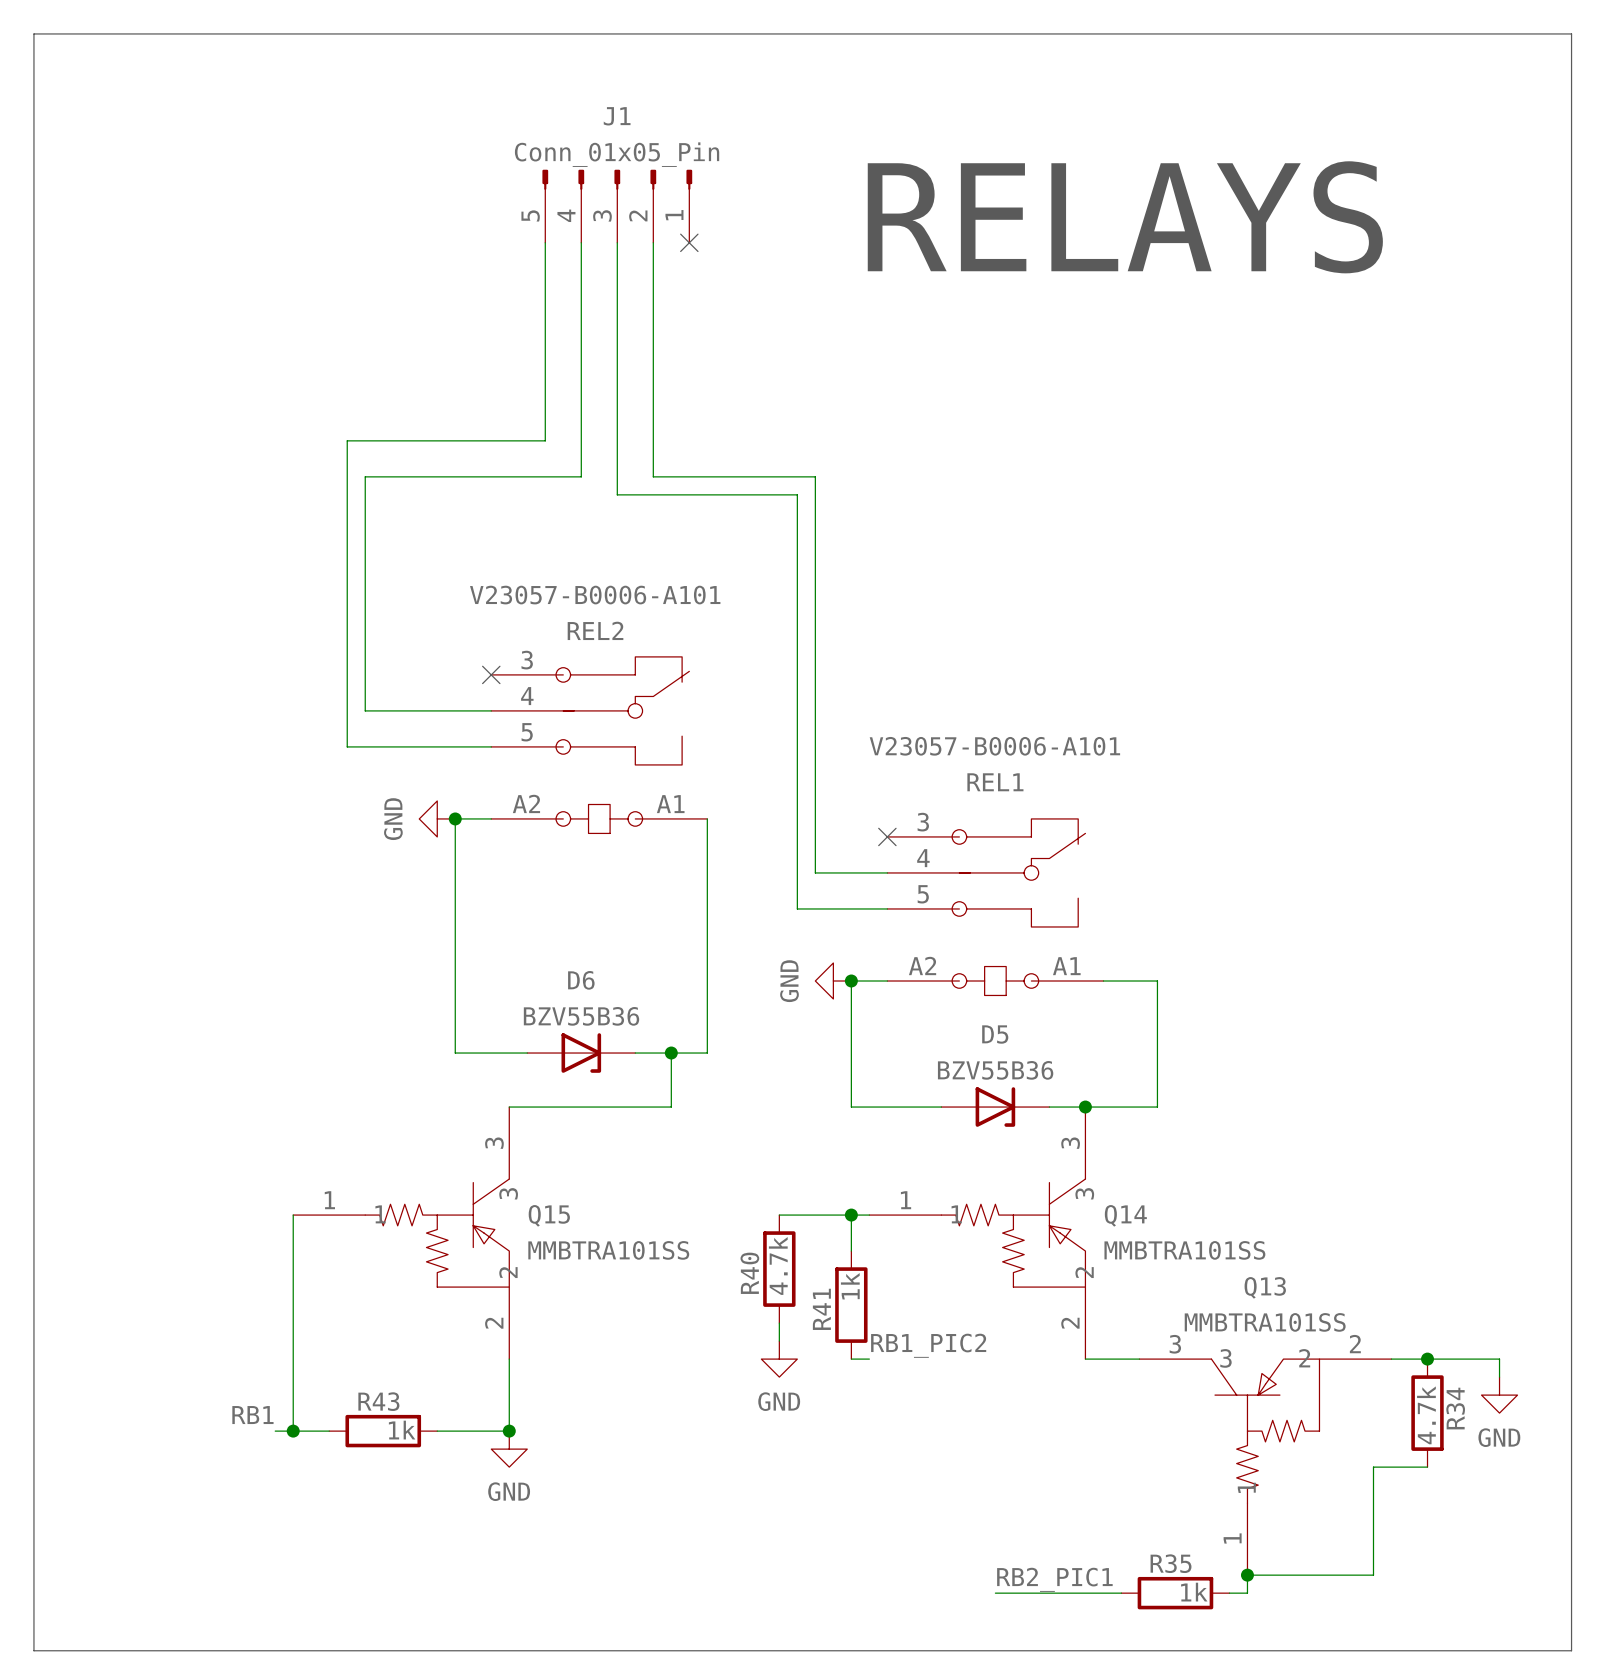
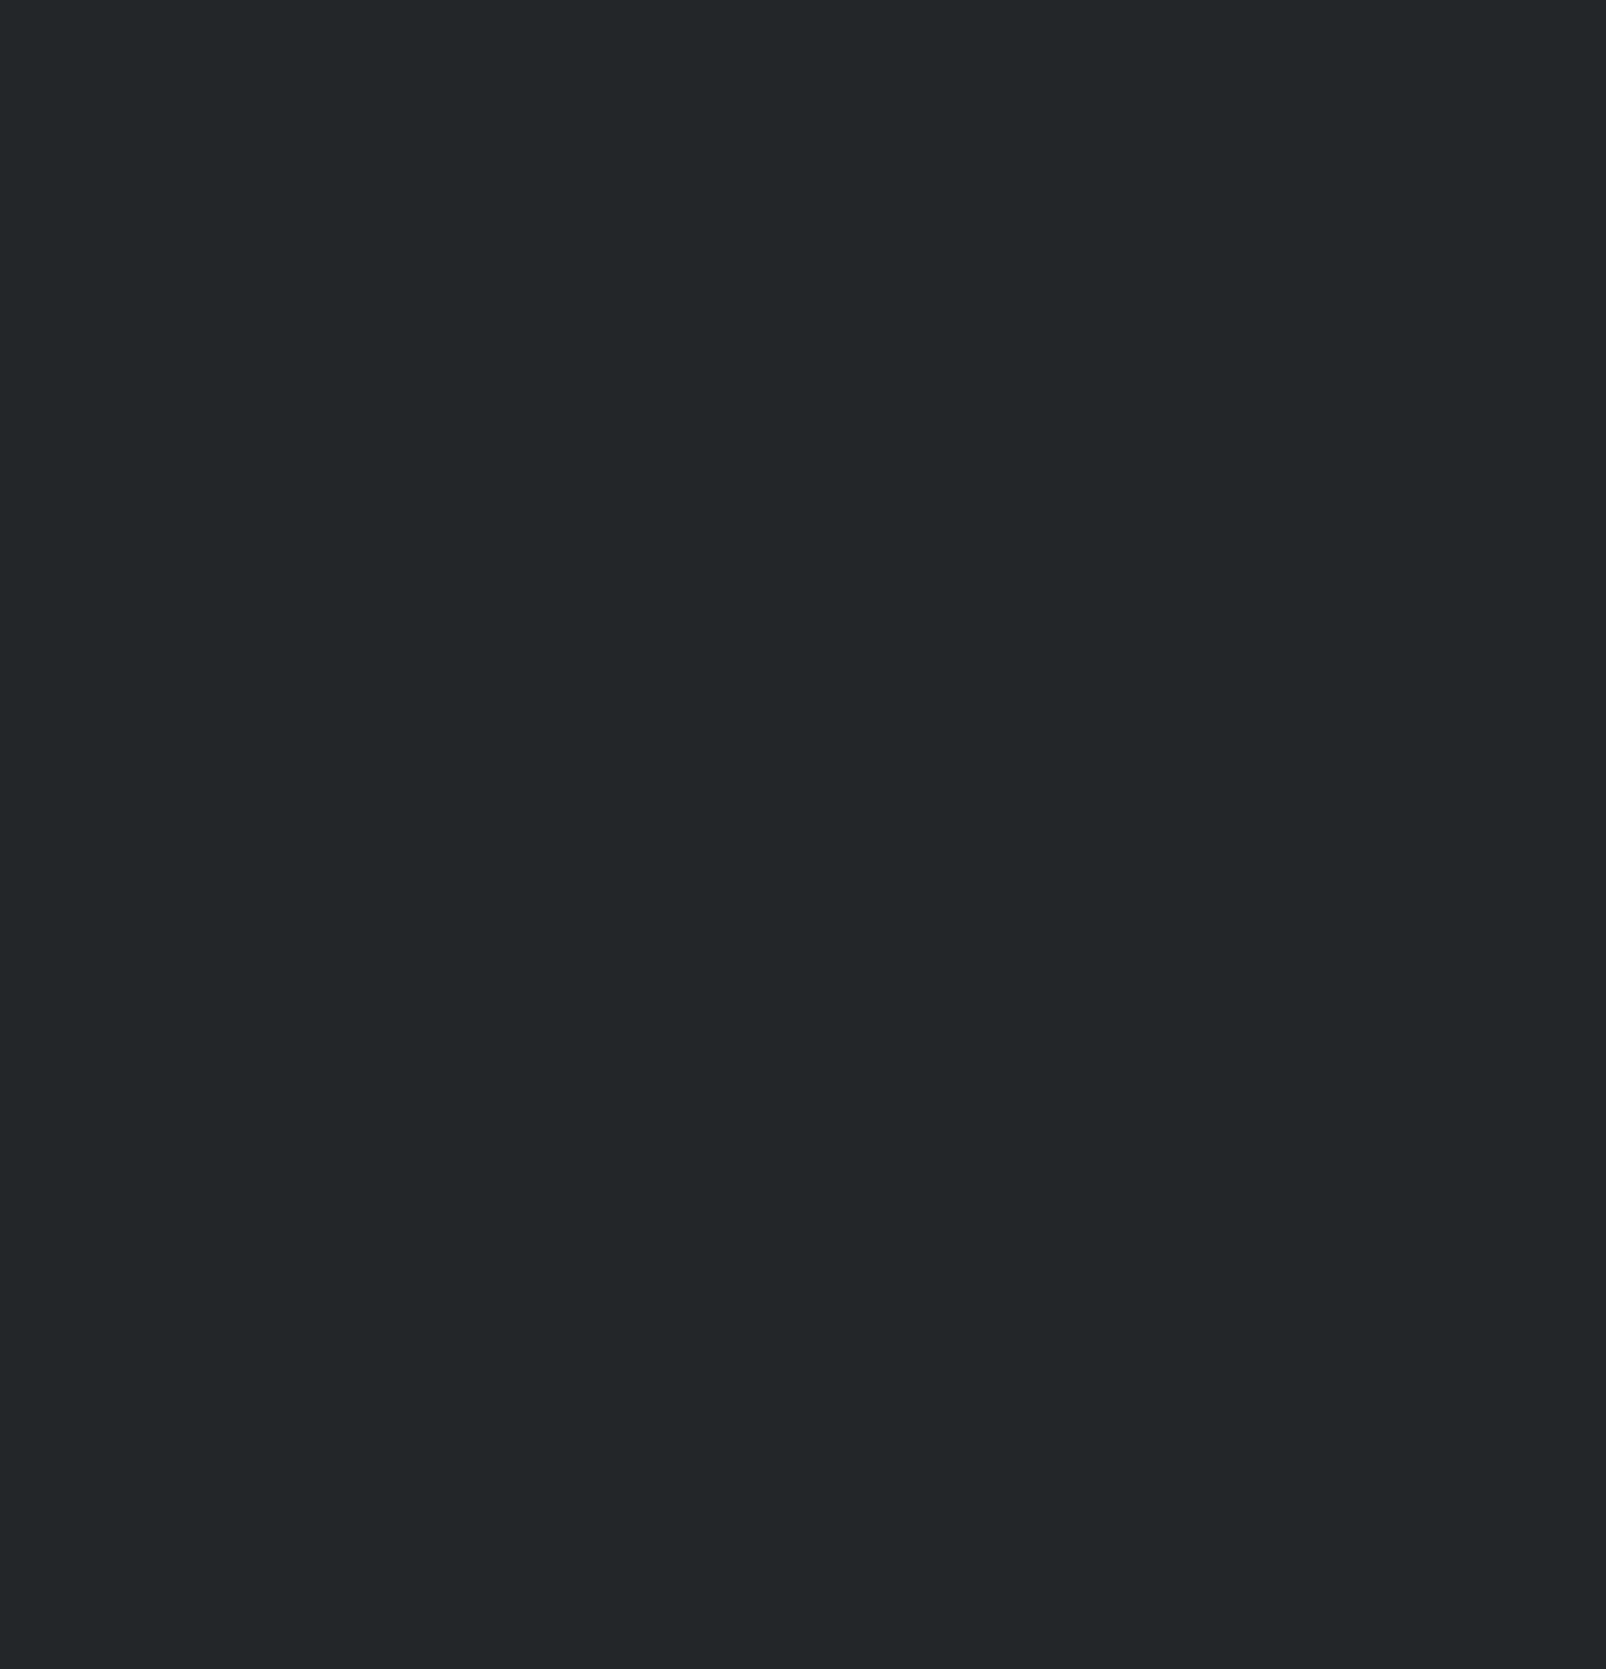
line: (33, 33) (1571, 33) (1571, 1650) (33, 1650) (33, 33) -> none
J1: Conn_01x05_Pin (617, 206) -> none
text: RELAYS (1125, 217) -> none
wire: (545, 242) (545, 440) (347, 440) (347, 746) (491, 746) -> none
wire: (581, 242) (581, 476) (365, 476) (365, 710) (491, 710) -> none
wire: (617, 242) (617, 494) (797, 494) (797, 908) (887, 908) -> none
wire: (653, 242) (653, 476) (815, 476) (815, 872) (887, 872) -> none
no-connect mark: (689, 242) -> none
no-connect mark: (491, 674) -> none
REL2: V23057-B0006-A101 (599, 745) -> none
power symbol: GND (437, 818) -> none
junction: (455, 818) -> none
wire: (491, 818) (455, 818) (455, 1053) (527, 1053) -> none
wire: (707, 818) (707, 1053) (635, 1053) -> none
no-connect mark: (887, 836) -> none
REL1: V23057-B0006-A101 (995, 907) -> none
power symbol: GND (833, 981) -> none
junction: (851, 981) -> none
wire: (887, 981) (851, 981) (851, 1107) (941, 1107) -> none
wire: (1103, 981) (1157, 981) (1157, 1107) (1049, 1107) -> none
D6: BZV55B36 (581, 1053) -> none
wire: (671, 1053) (671, 1107) (509, 1107) -> none
junction: (671, 1053) -> none
D5: BZV55B36 (995, 1107) -> none
junction: (1085, 1107) -> none
wire: (293, 1215) (293, 1431) -> none
wire: (779, 1215) (869, 1215) -> none
wire: (851, 1215) (851, 1251) -> none
junction: (851, 1215) -> none
Q15: MMBTRA101SS (401, 1233) -> none
Q14: MMBTRA101SS (977, 1233) -> none
R40: 4.7k (779, 1269) -> none
R41: 1k (851, 1305) -> none
wire: (779, 1323) (779, 1341) -> none
label: RB1_PIC2 (928, 1345) -> none
wire: (509, 1359) (509, 1431) (437, 1431) -> none
power symbol: GND (779, 1359) -> none
wire: (851, 1359) (869, 1359) -> none
wire: (1085, 1359) (1139, 1359) -> none
wire: (1391, 1359) (1499, 1359) (1499, 1377) -> none
junction: (1427, 1359) -> none
power symbol: GND (1499, 1395) -> none
R34: 4.7k (1427, 1413) -> none
label: RB1 (252, 1415) -> none
wire: (275, 1431) (329, 1431) -> none
junction: (293, 1431) -> none
R43: 1k (383, 1431) -> none
junction: (509, 1431) -> none
power symbol: GND (509, 1449) -> none
Q13: MMBTRA101SS (1265, 1467) -> none
wire: (1427, 1467) (1373, 1467) (1373, 1575) (1247, 1575) (1247, 1593) (1229, 1593) -> none
junction: (1247, 1575) -> none
label: RB2_PIC1 (1054, 1579) -> none
wire: (995, 1593) (1121, 1593) -> none
R35: 1k (1175, 1593) -> none

